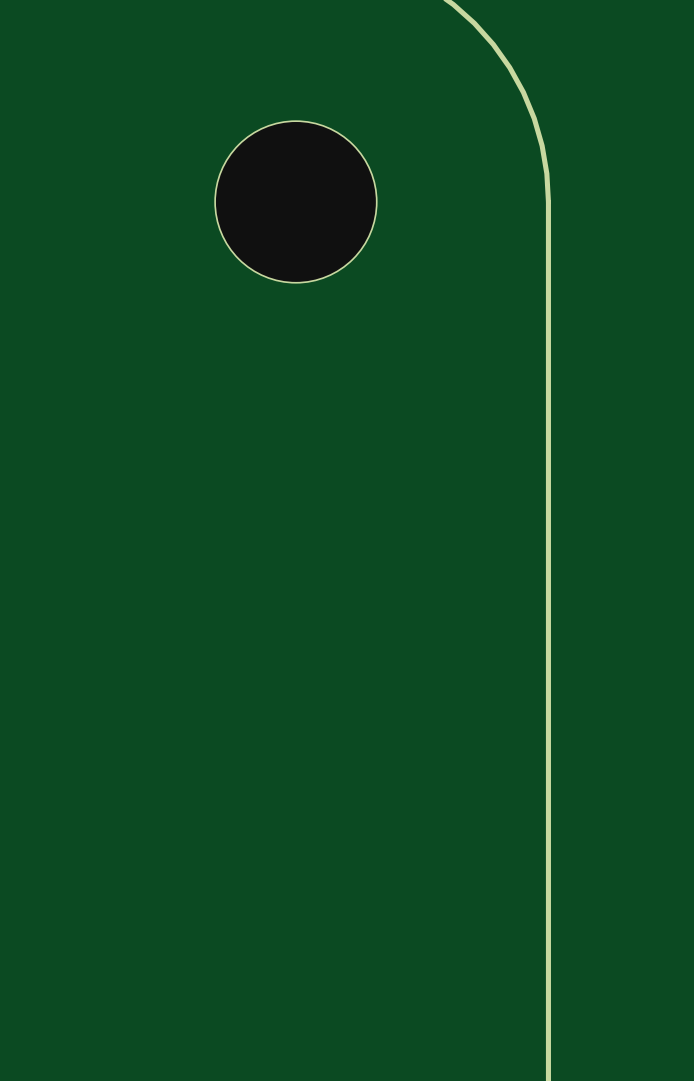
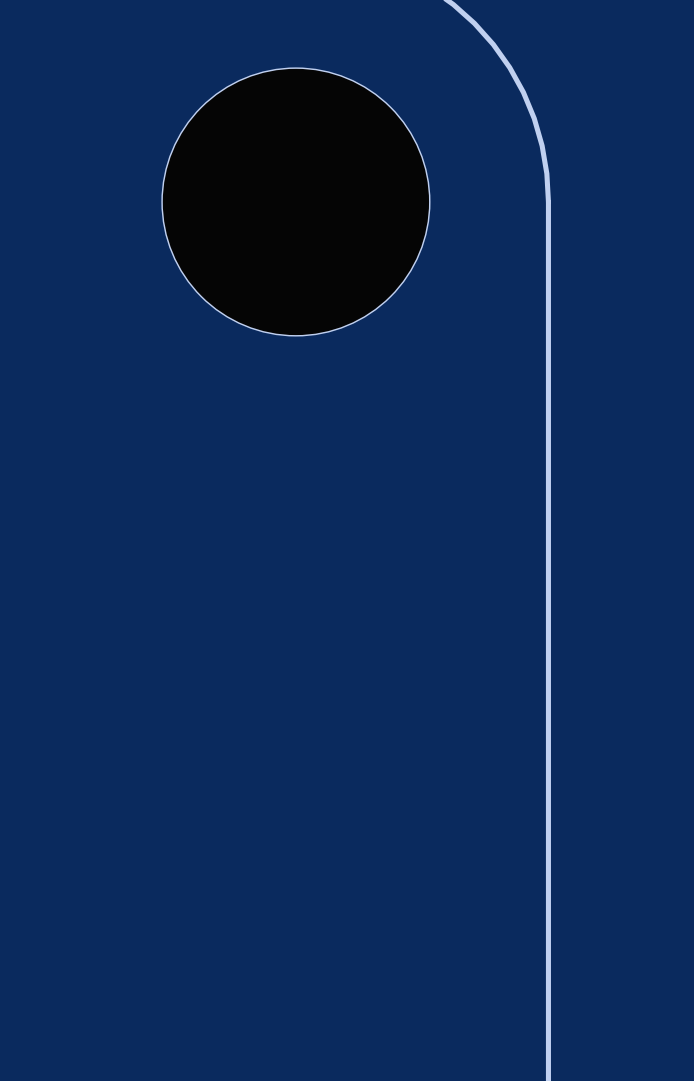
part footprint: [215, 121, 377, 283] -> [162, 68, 430, 336]

